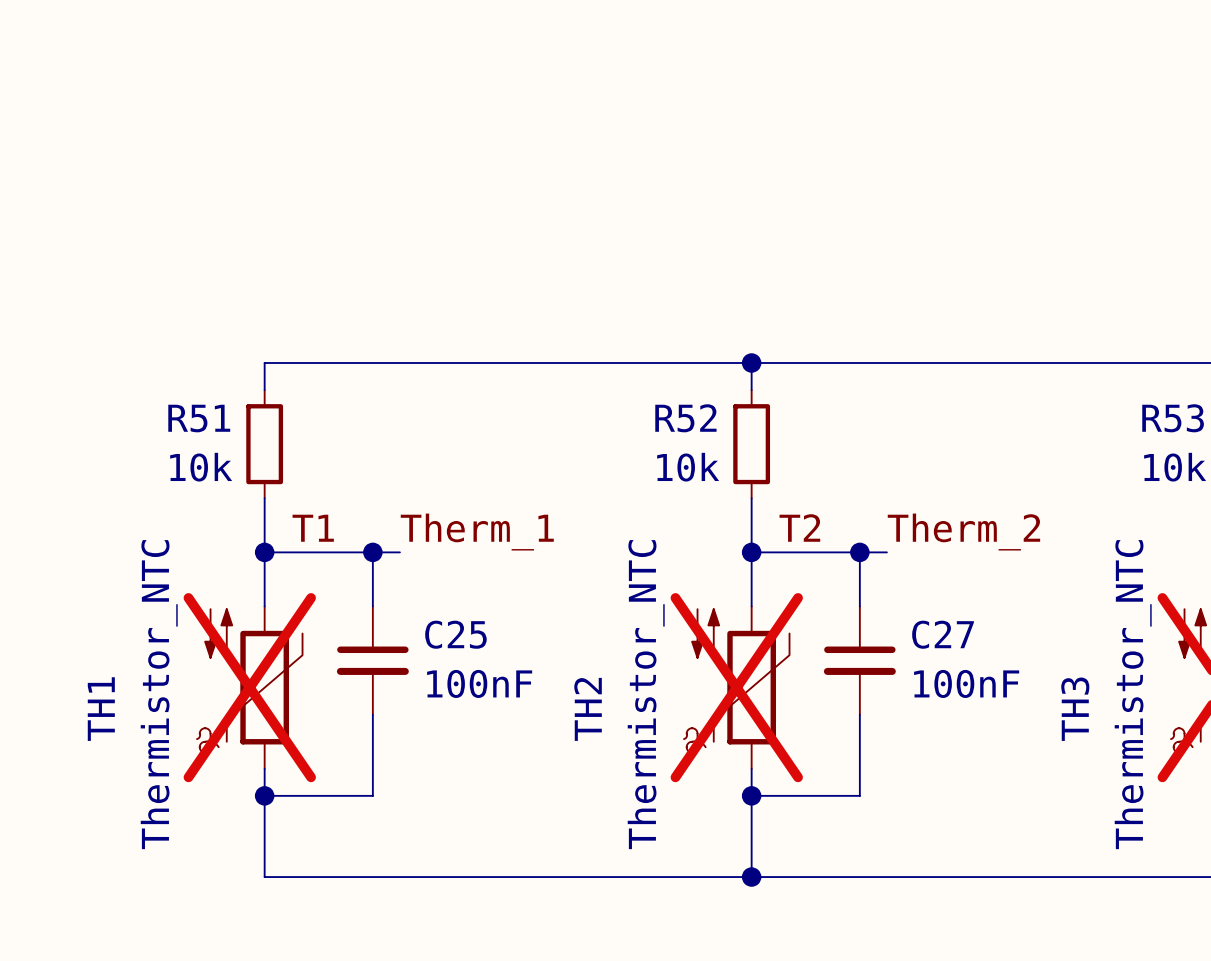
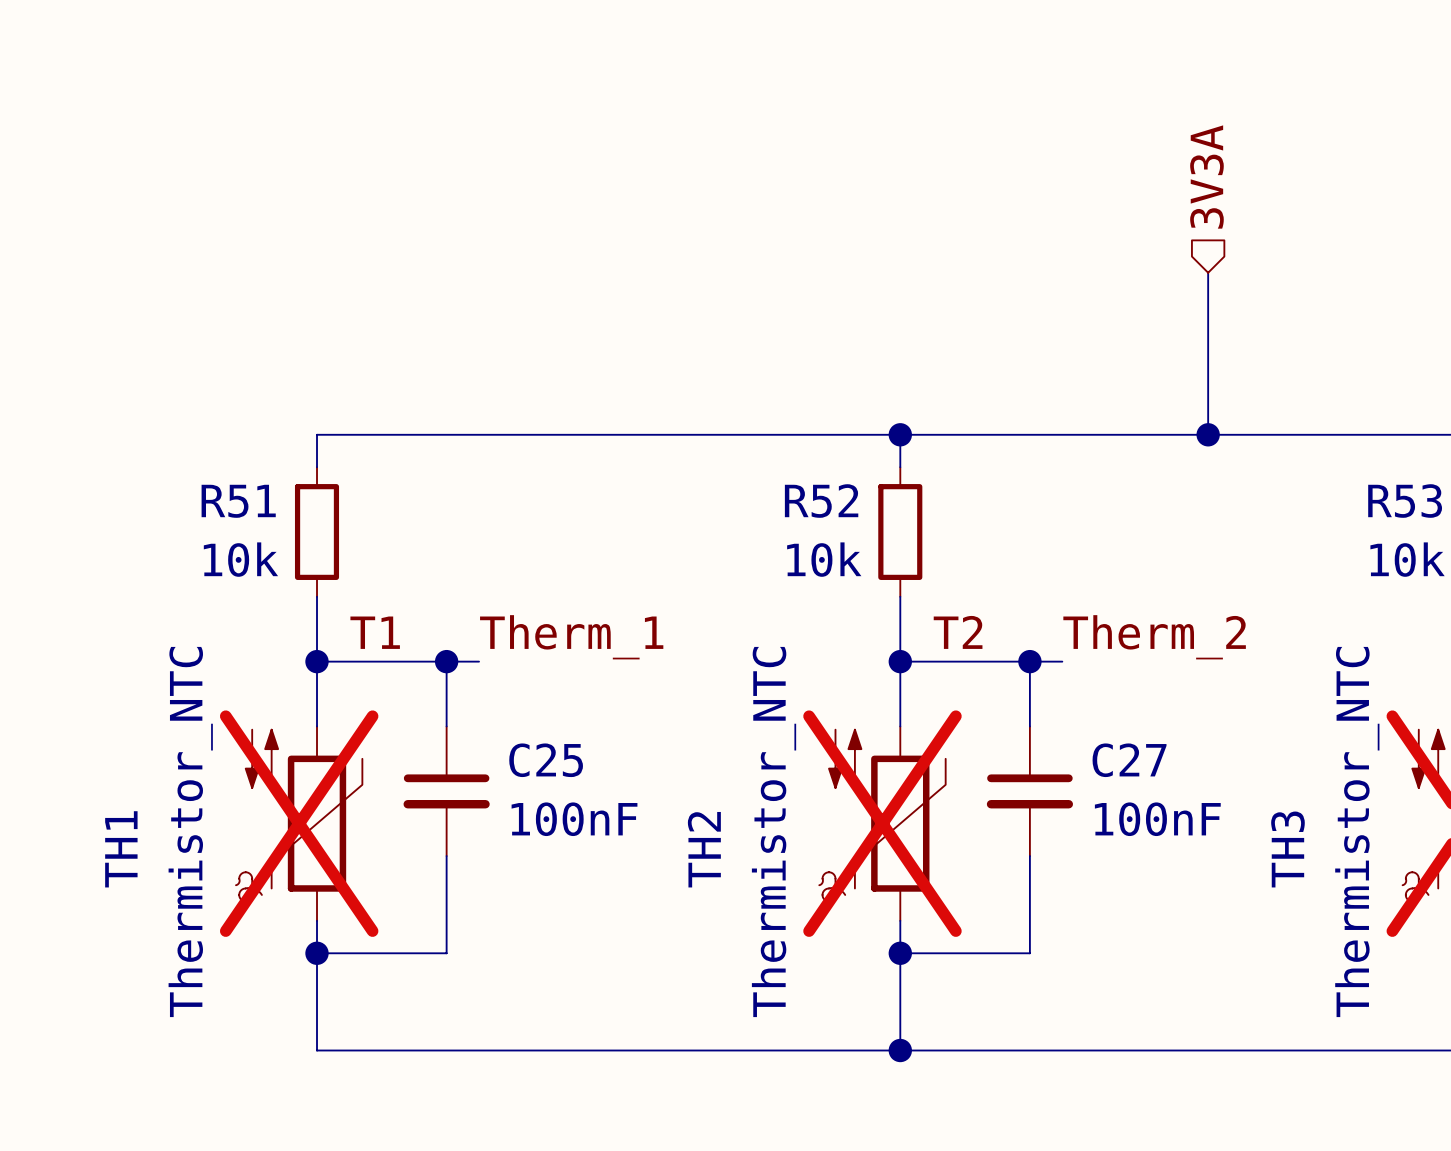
hierarchical label: none -> 3V3A (1206, 177)
wire: none -> (1208, 272) (1208, 434)
junction: none -> (1208, 434)

